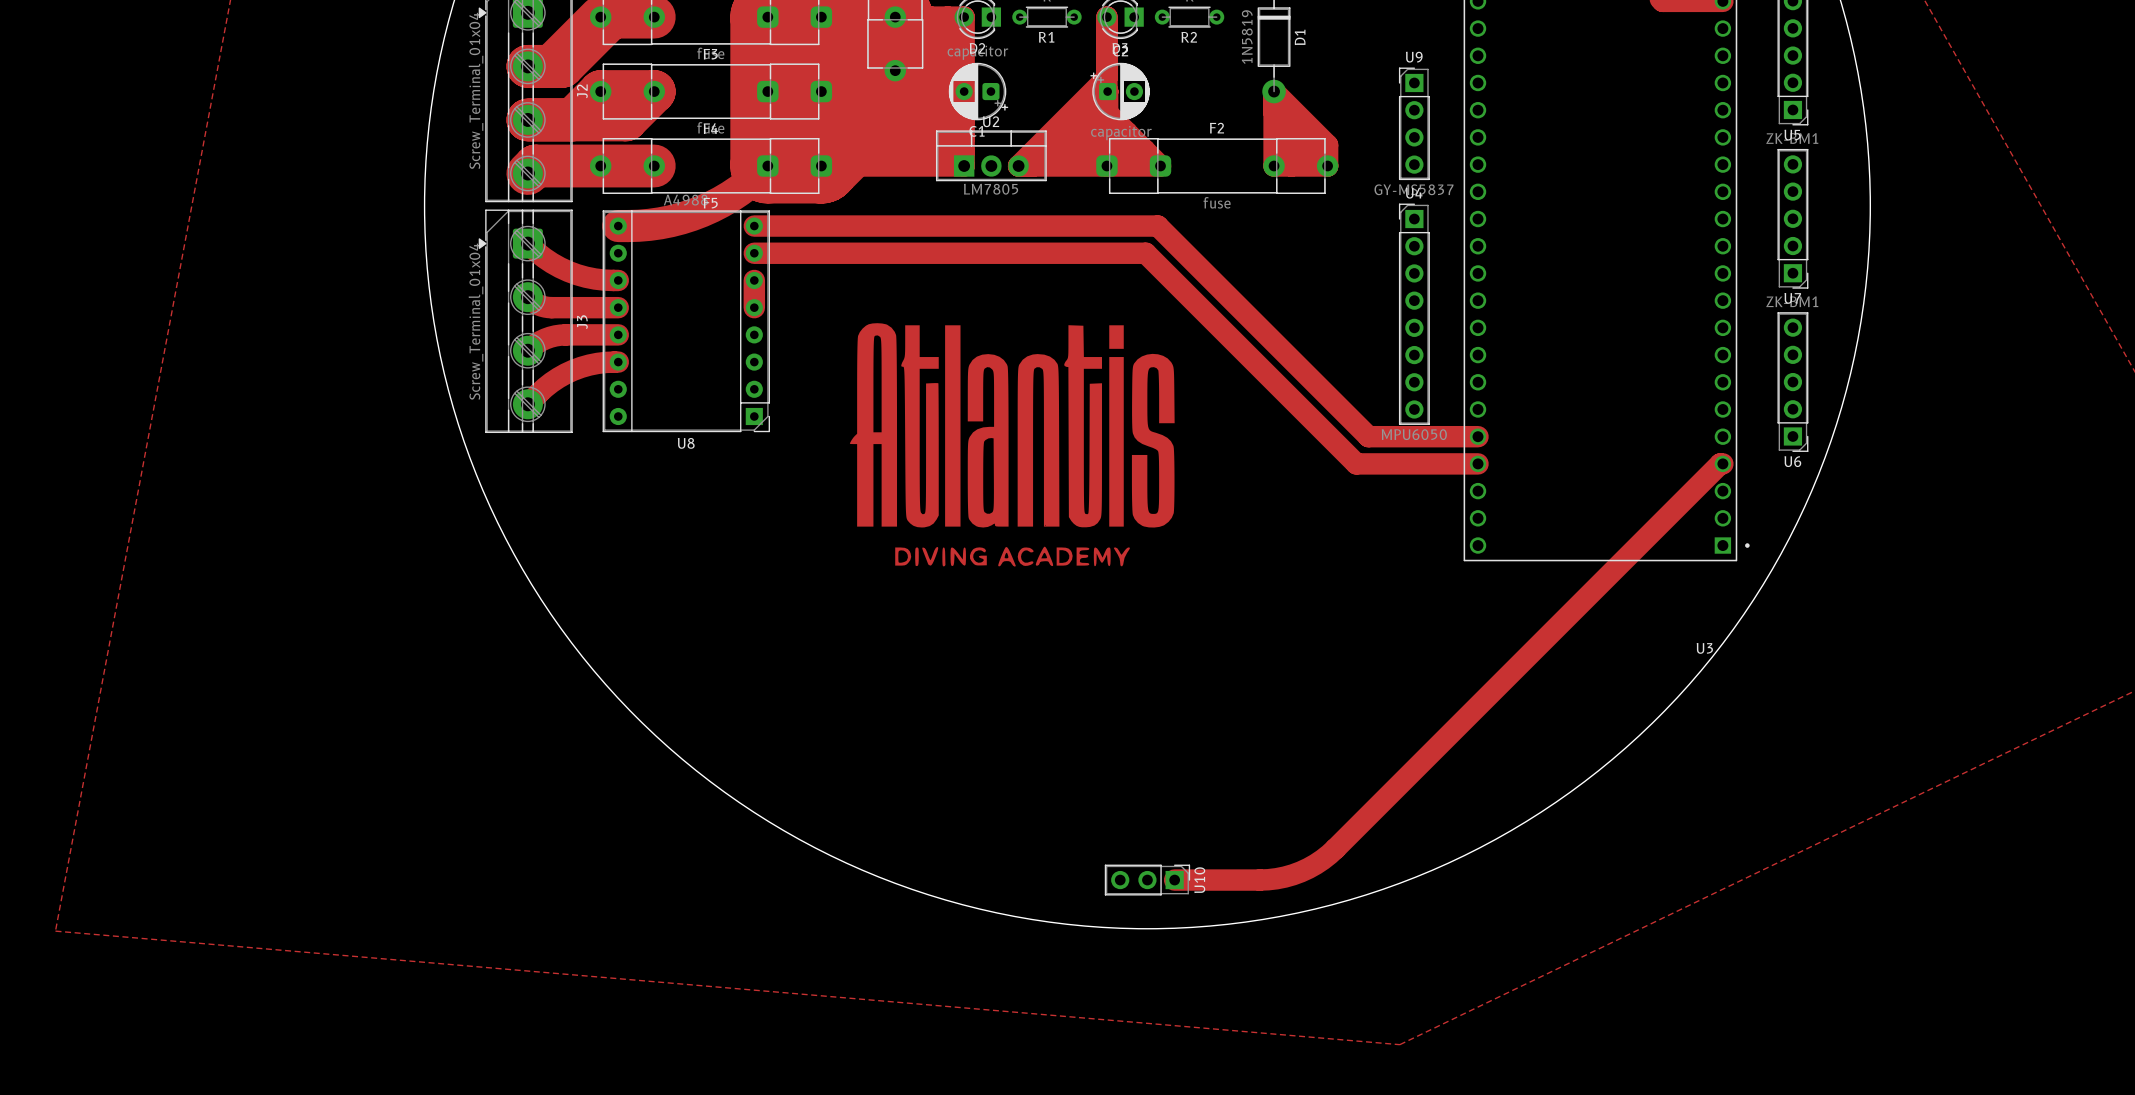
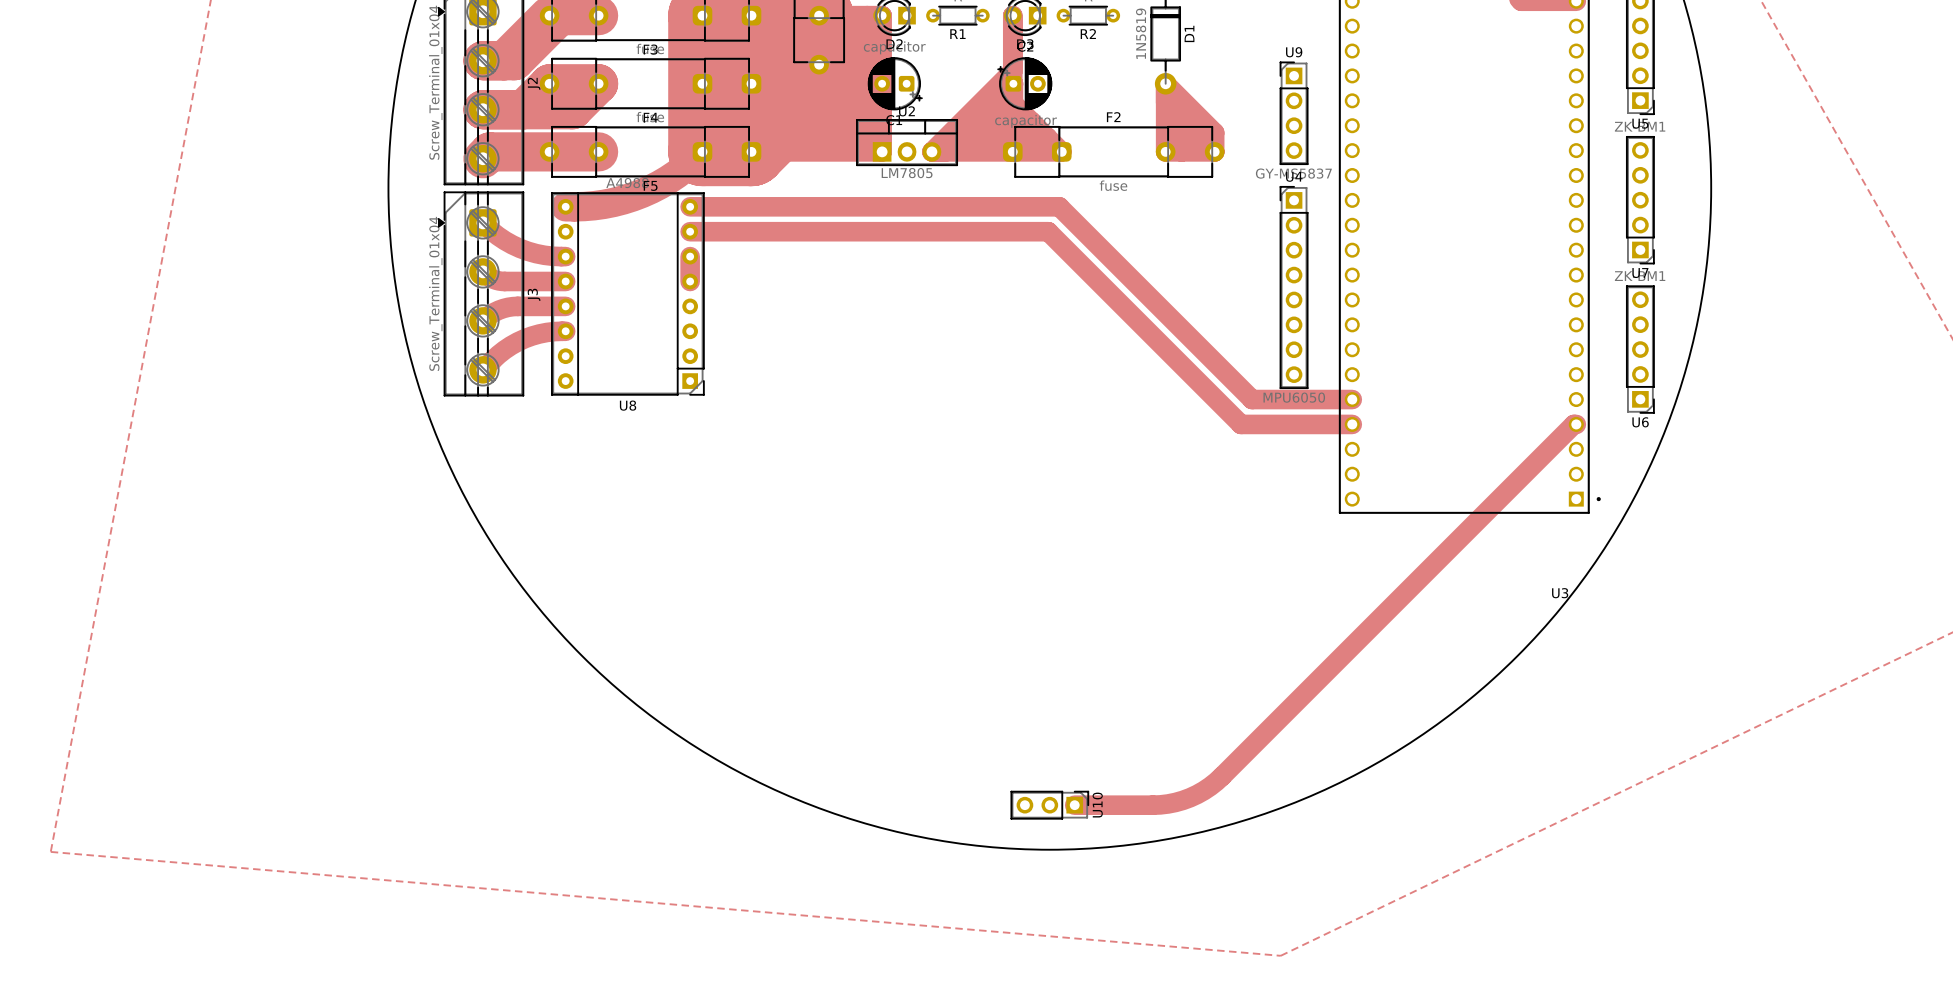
drawing: [849, 323, 1175, 567] -> none

